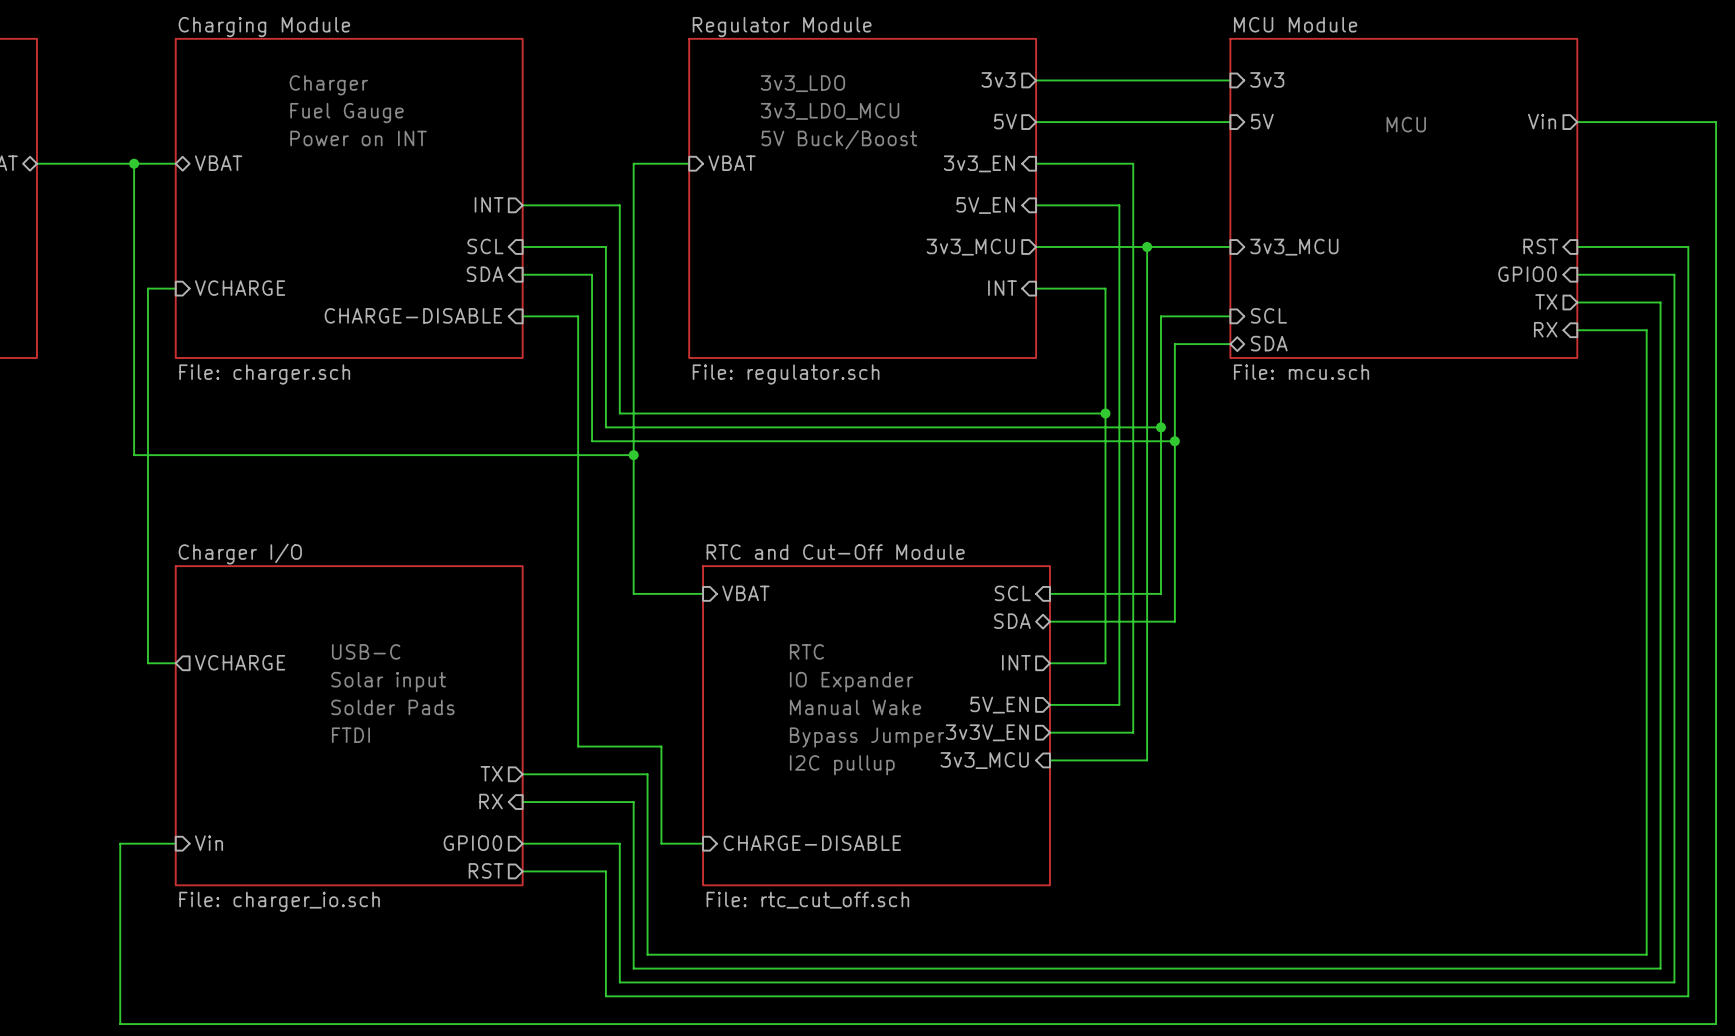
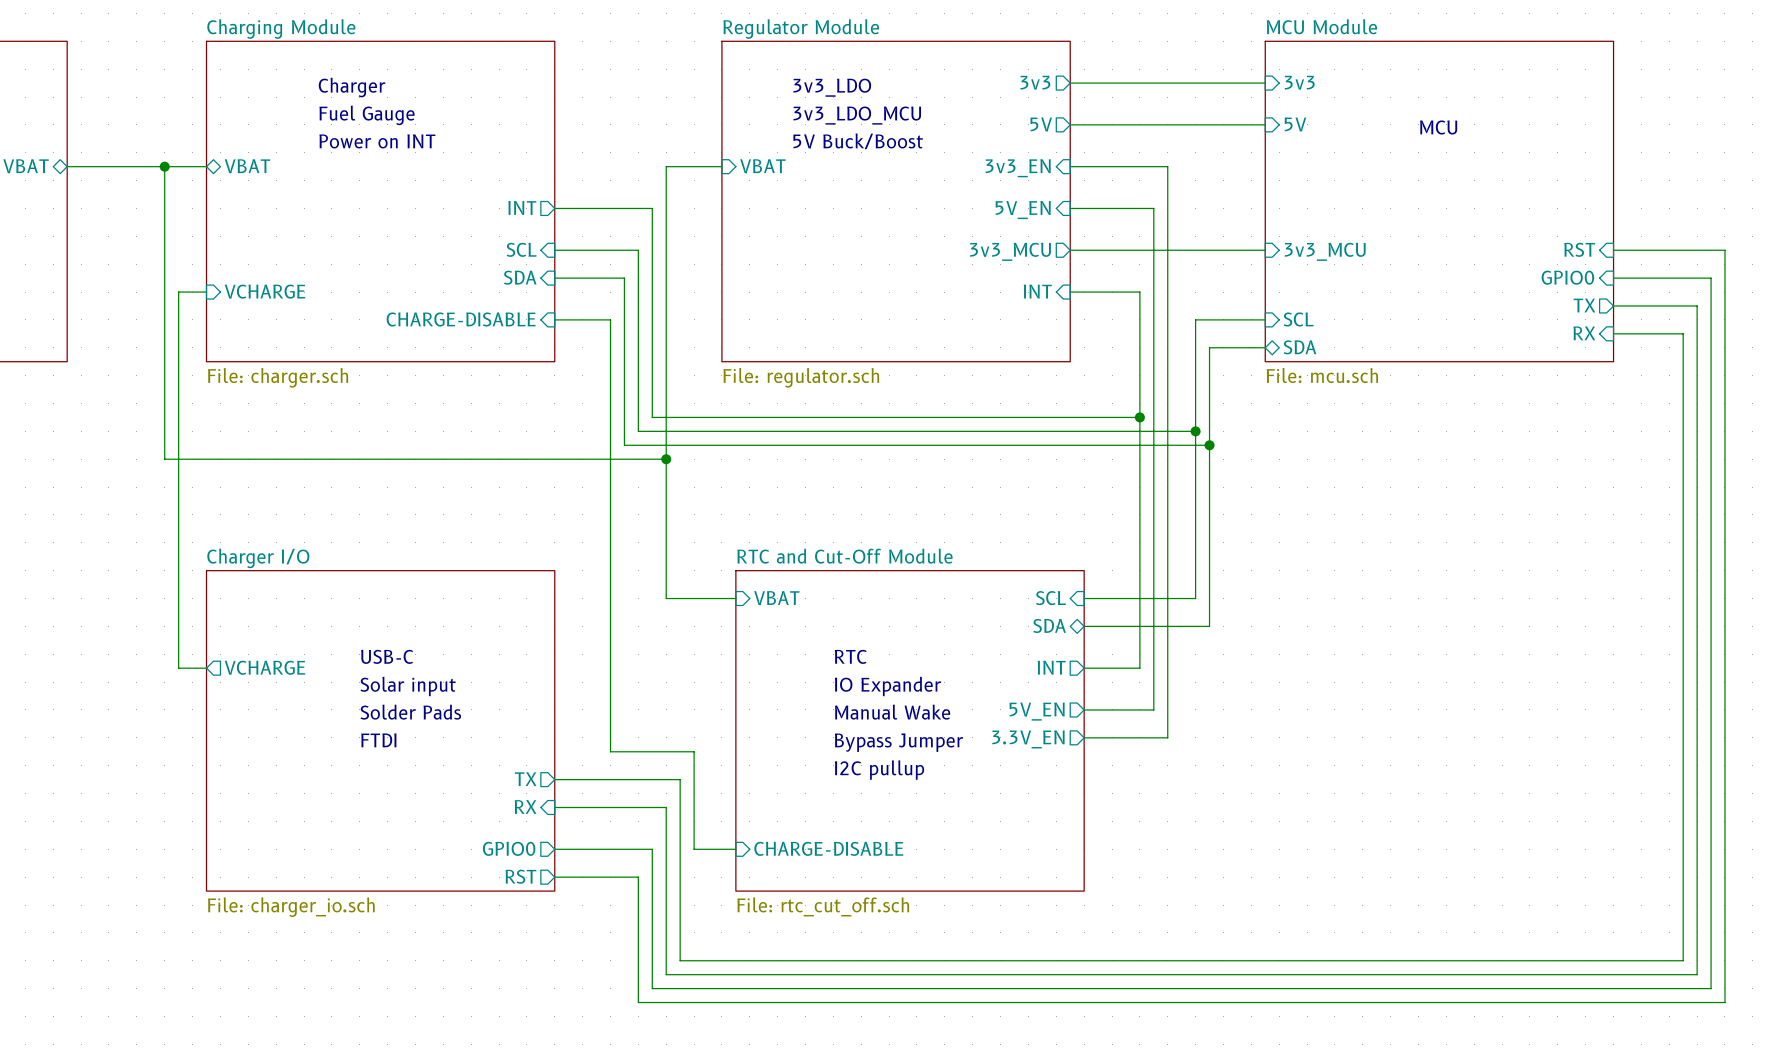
sheet pin: Vin (1542, 121) -> none
wire: (1577, 122) (1716, 122) (1716, 1024) (120, 1024) (120, 843) (175, 843) -> none
wire: (1147, 246) (1147, 760) (1049, 760) -> none
junction: (1147, 246) -> none
text position: RTC (806, 651) -> RTC (850, 656)
text position: IO Expander (851, 681) -> IO Expander (887, 686)
text position: Manual Wake (855, 707) -> Manual Wake (892, 712)
sheet pin: 3v3V_EN (987, 732) -> 3.3V_EN (1028, 739)
text position: Bypass Jumper (867, 737) -> Bypass Jumper (898, 742)
sheet pin: 3v3_MCU (984, 760) -> none
text position: I2C pullup (842, 765) -> I2C pullup (879, 770)
sheet pin: Vin (208, 843) -> none

